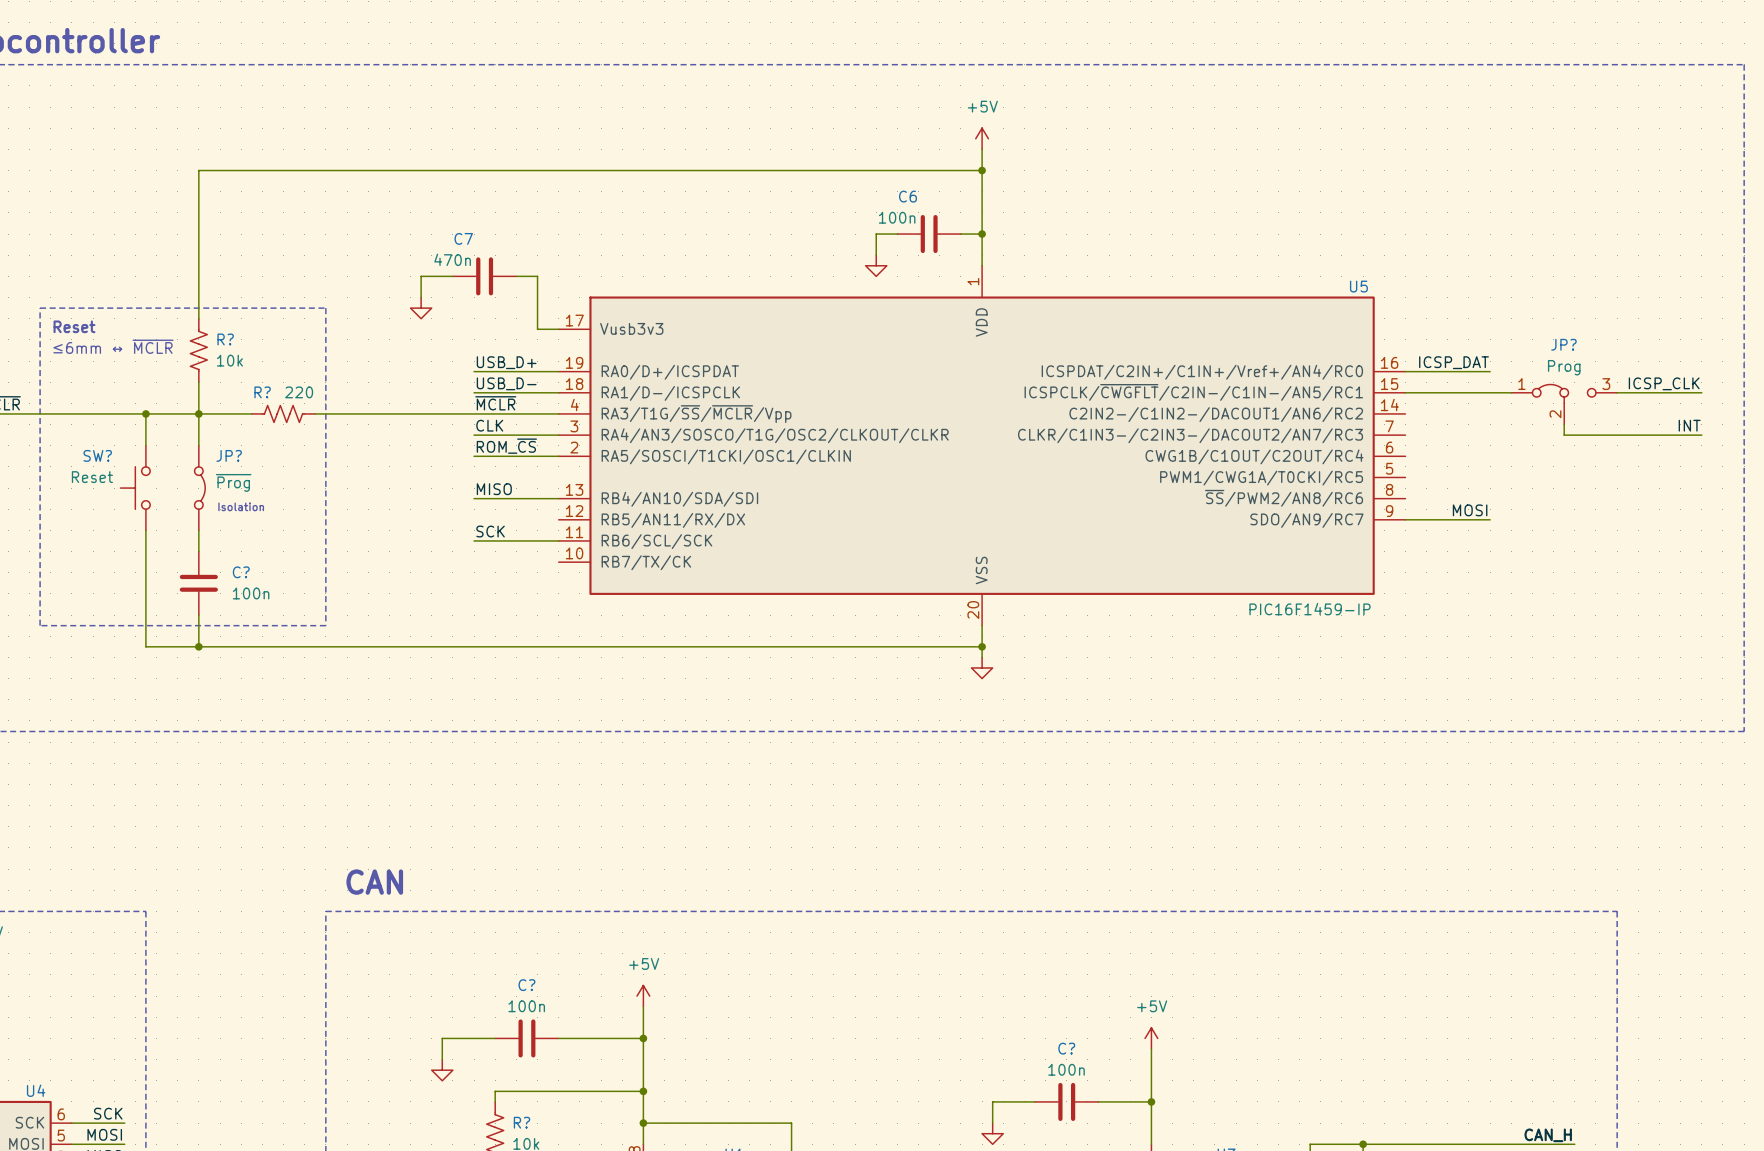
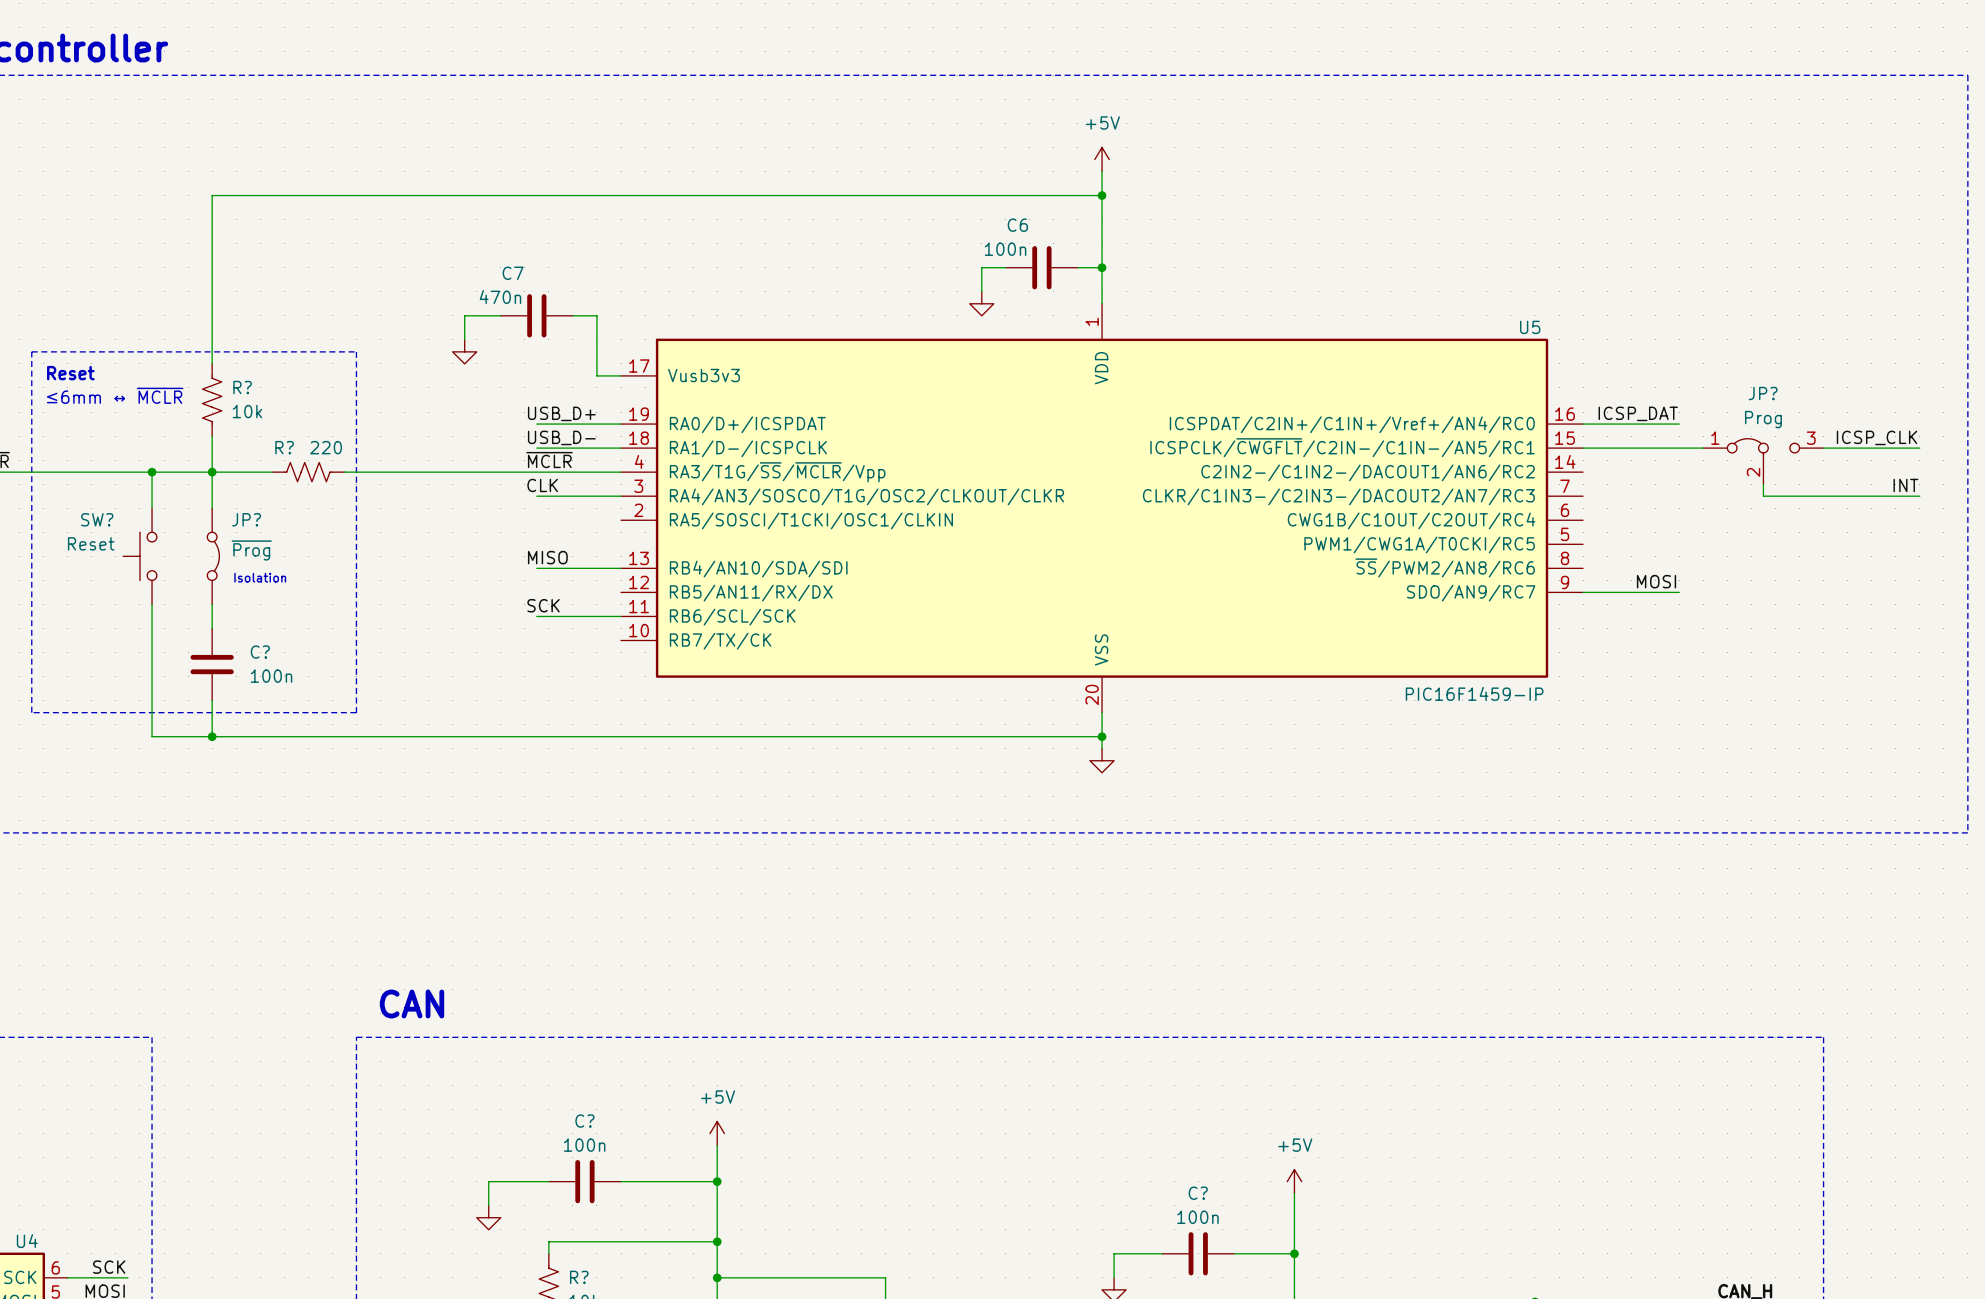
wire: (474, 371) (484, 371) -> none
wire: (474, 392) (484, 392) -> none
wire: (474, 435) (484, 435) -> none
label: ROM_~{CS} (506, 446) -> none
wire: (474, 456) (558, 456) -> none
wire: (474, 498) (484, 498) -> none
wire: (474, 540) (484, 540) -> none

